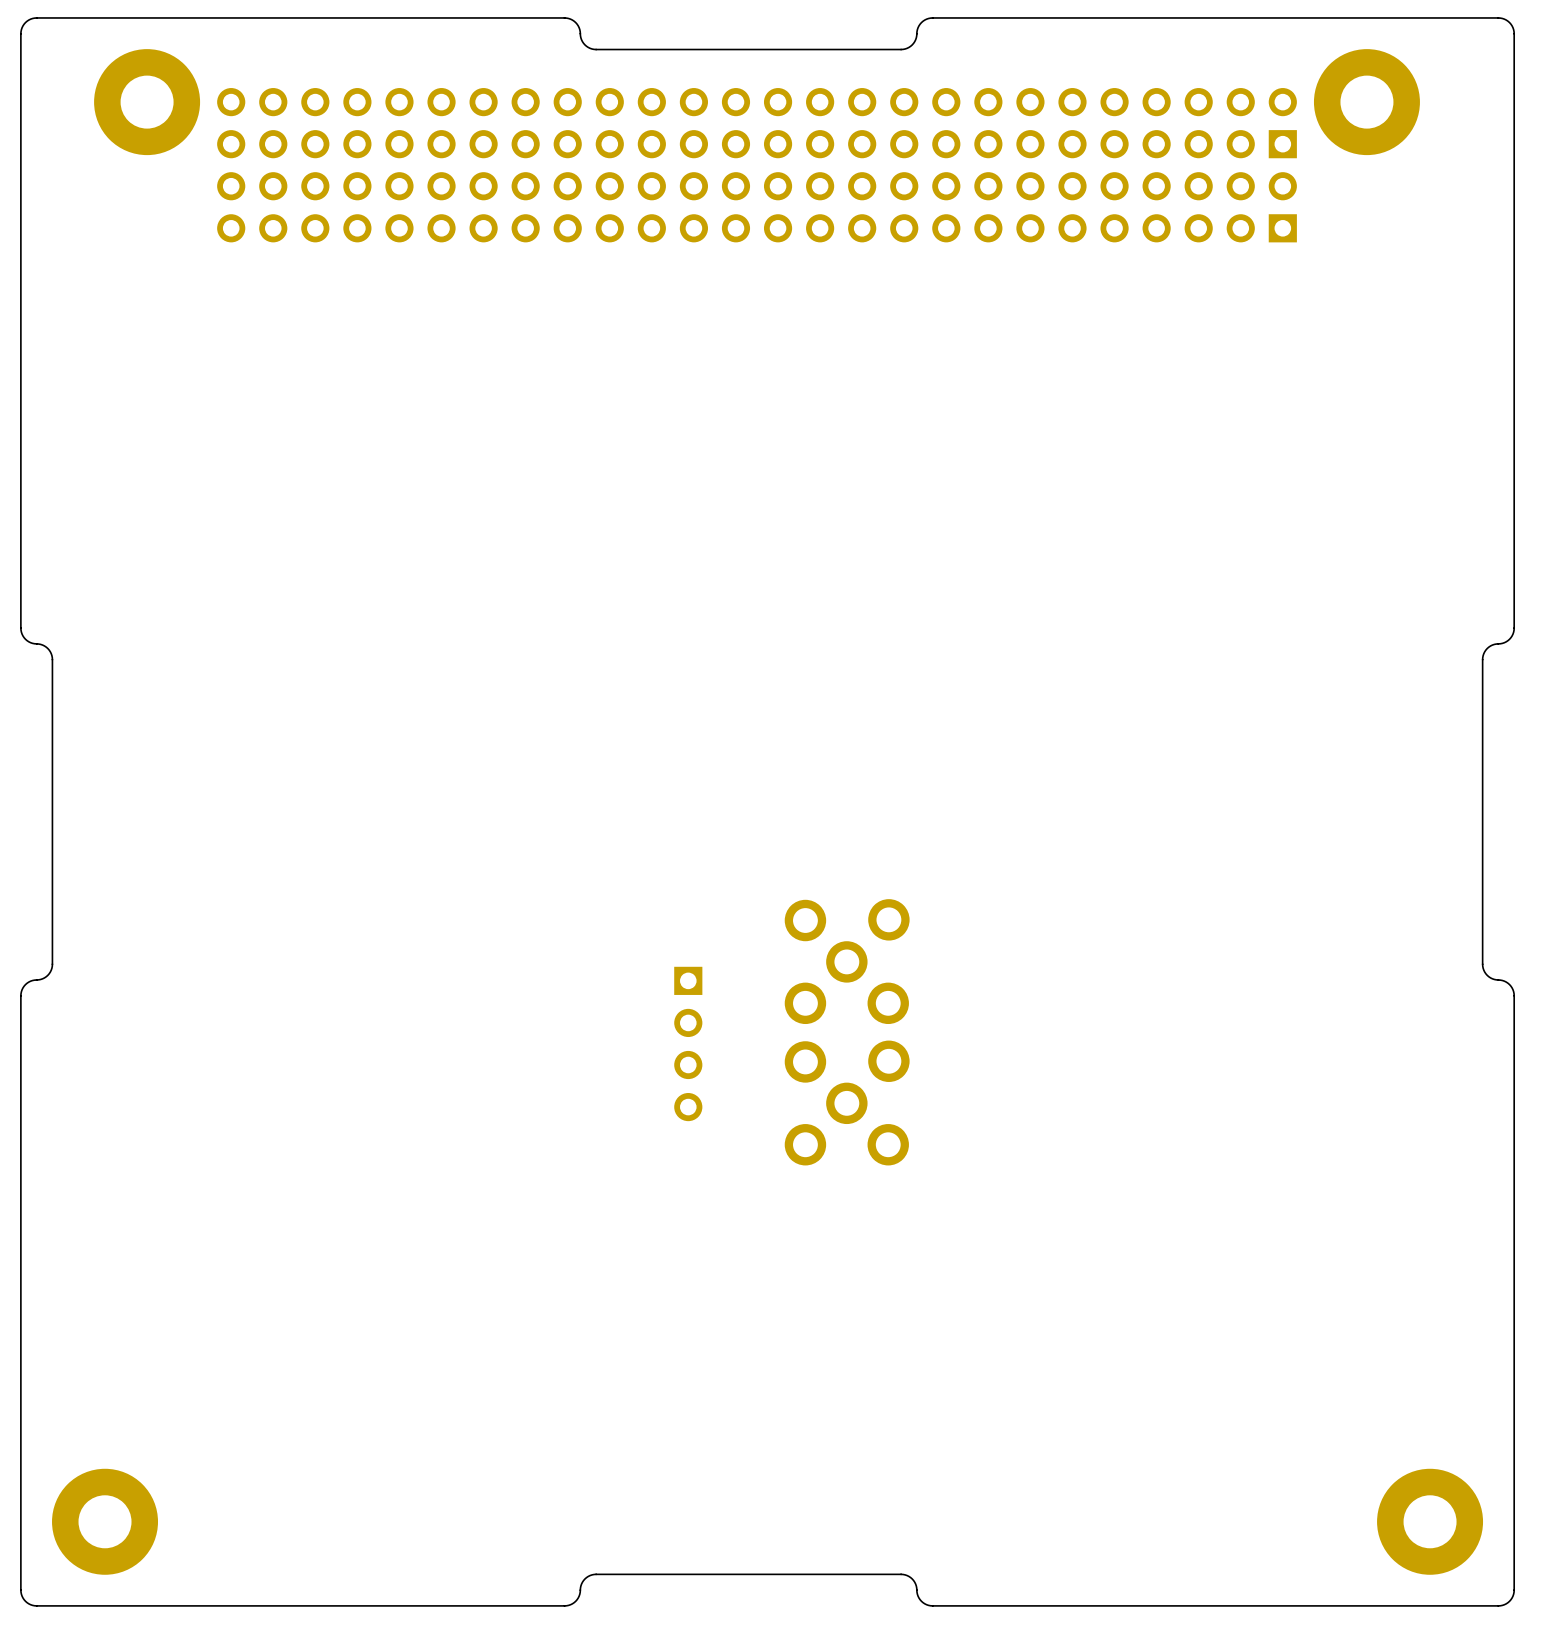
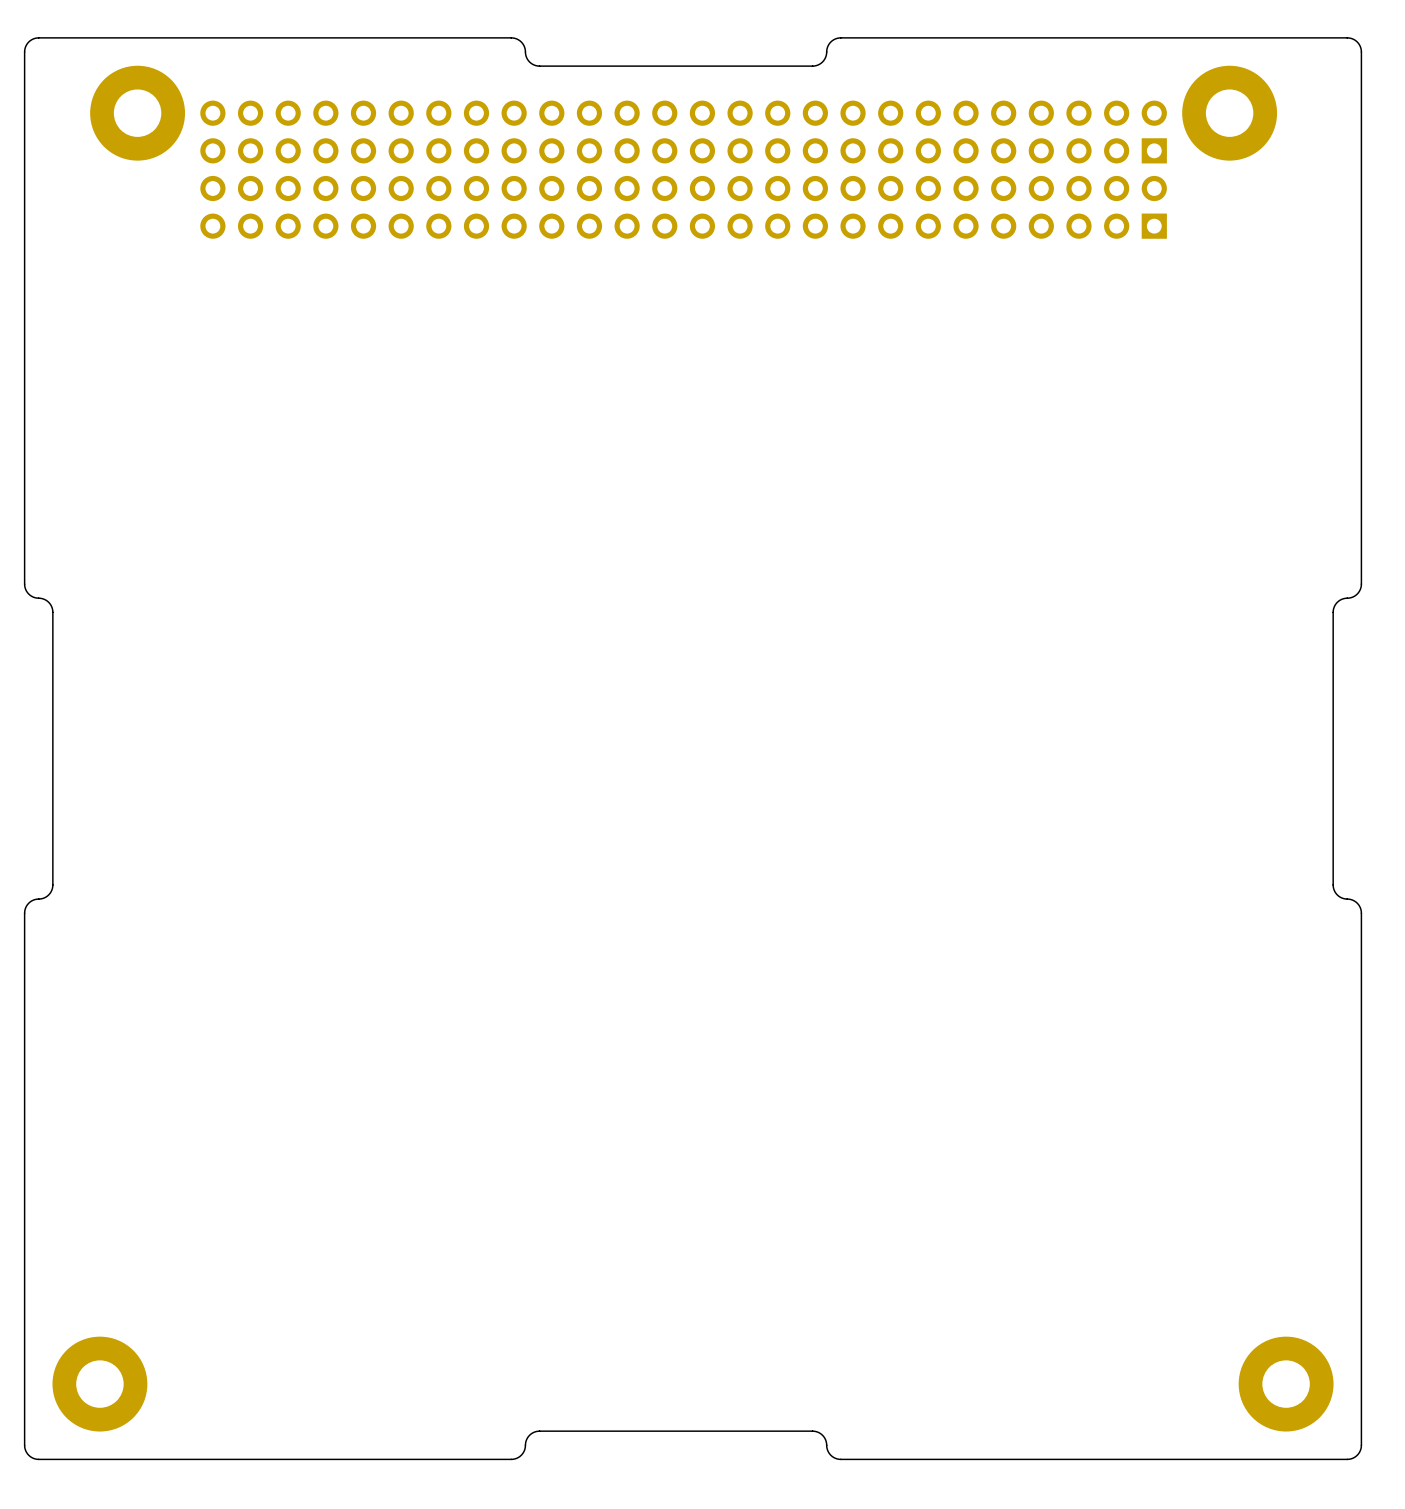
part: (847, 961) -> none
part: (688, 1043) -> none
part: (847, 1103) -> none

